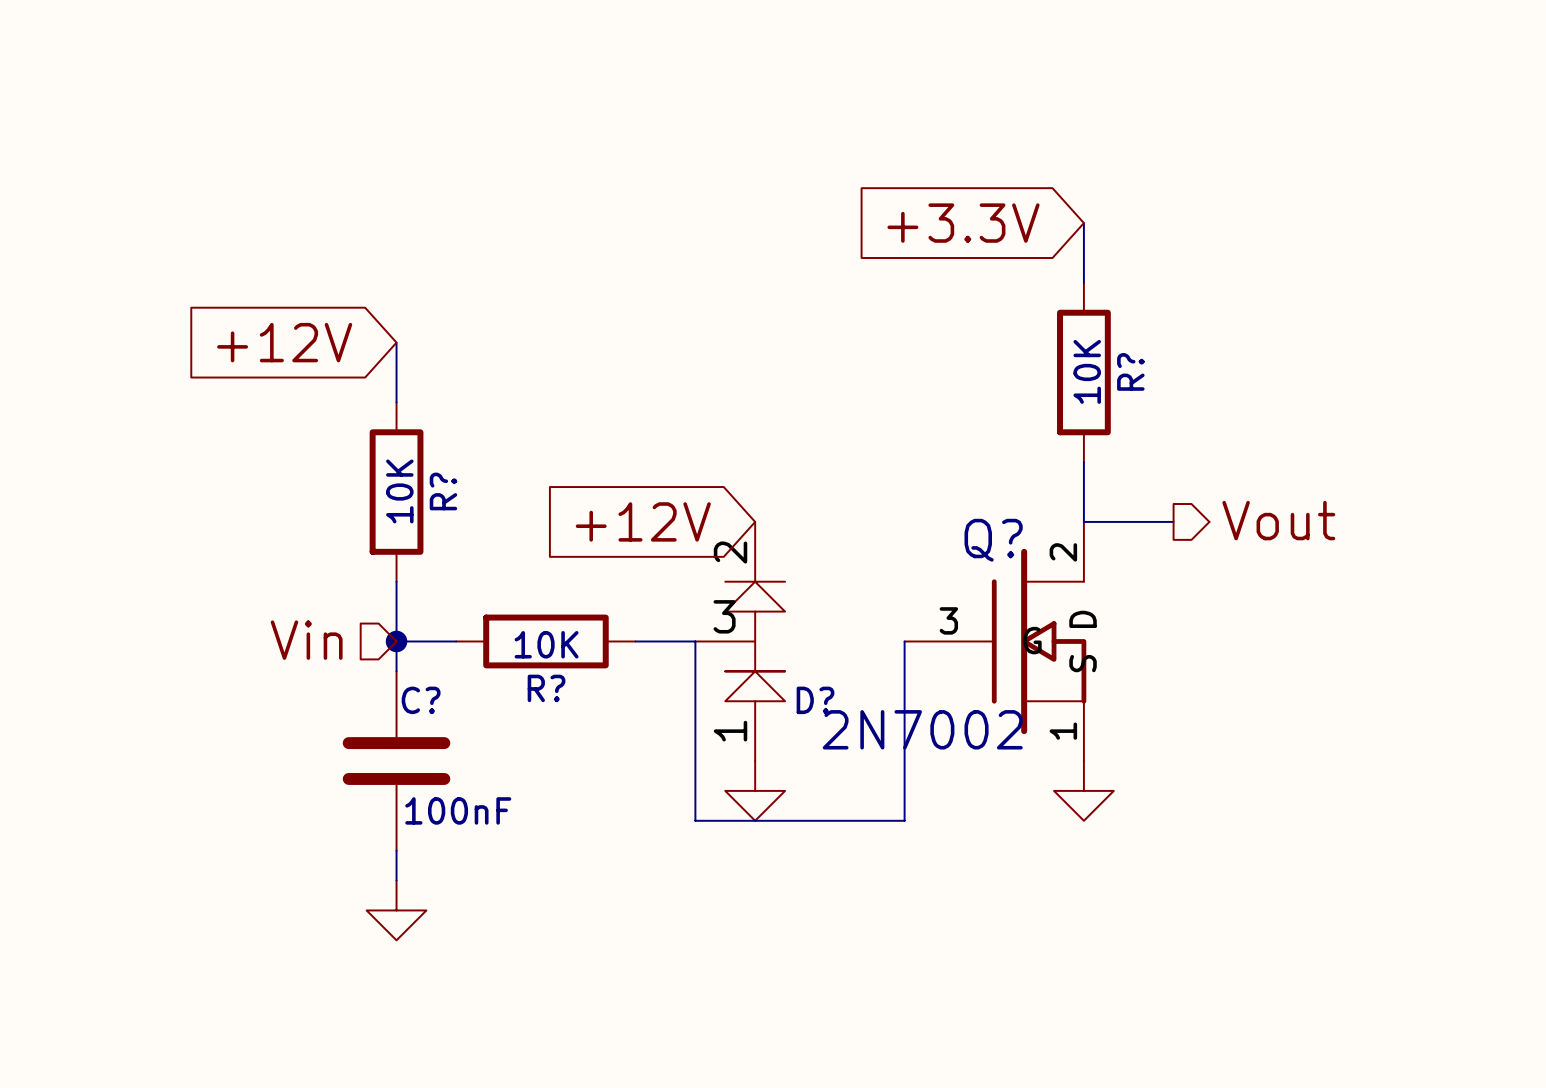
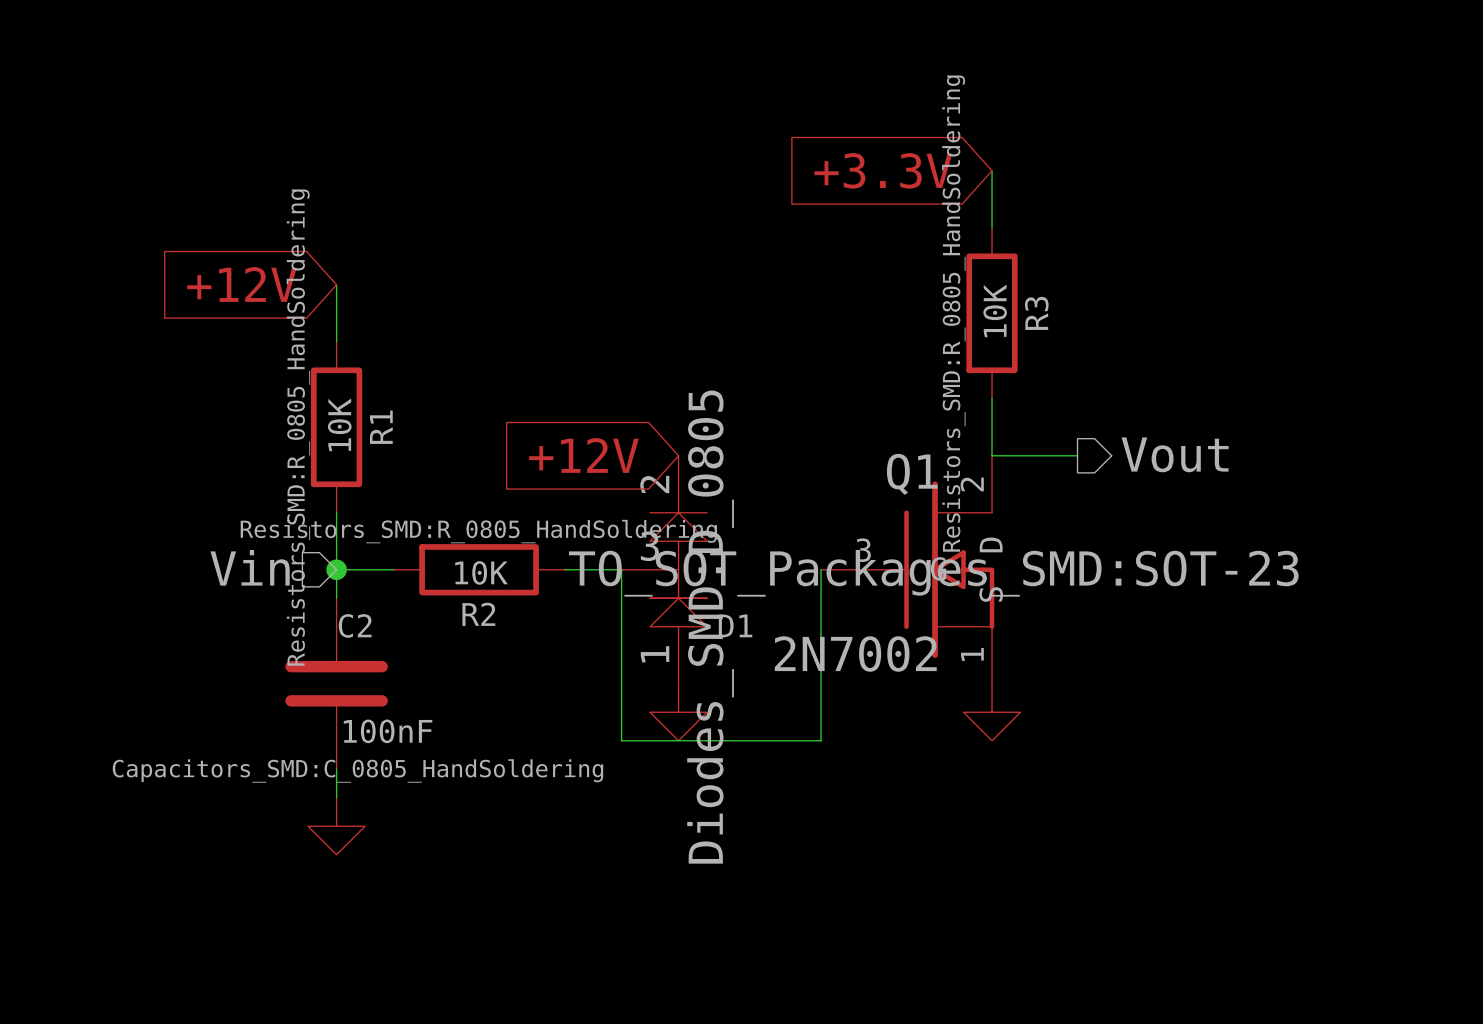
R? name: R? (1130, 371) -> R3 (1036, 313)
R? text: none -> Resistors_SMD:R_0805_HandSoldering (953, 313)
R? name: R? (443, 491) -> R1 (381, 427)
R? text: none -> Resistors_SMD:R_0805_HandSoldering (298, 427)
Q? name: Q? (993, 540) -> Q1 (912, 474)
R? text: none -> Resistors_SMD:R_0805_HandSoldering (478, 531)
Q? text: none -> TO_SOT_Packages_SMD:SOT-23 (933, 573)
R? name: R? (546, 688) -> R2 (478, 614)
C? name: C? (421, 700) -> C2 (355, 625)
D? text: none -> Diodes_SMD:D_0805 (710, 627)
D? name: D? (815, 700) -> D1 (735, 625)
C? text: none -> Capacitors_SMD:C_0805_HandSoldering (357, 770)

